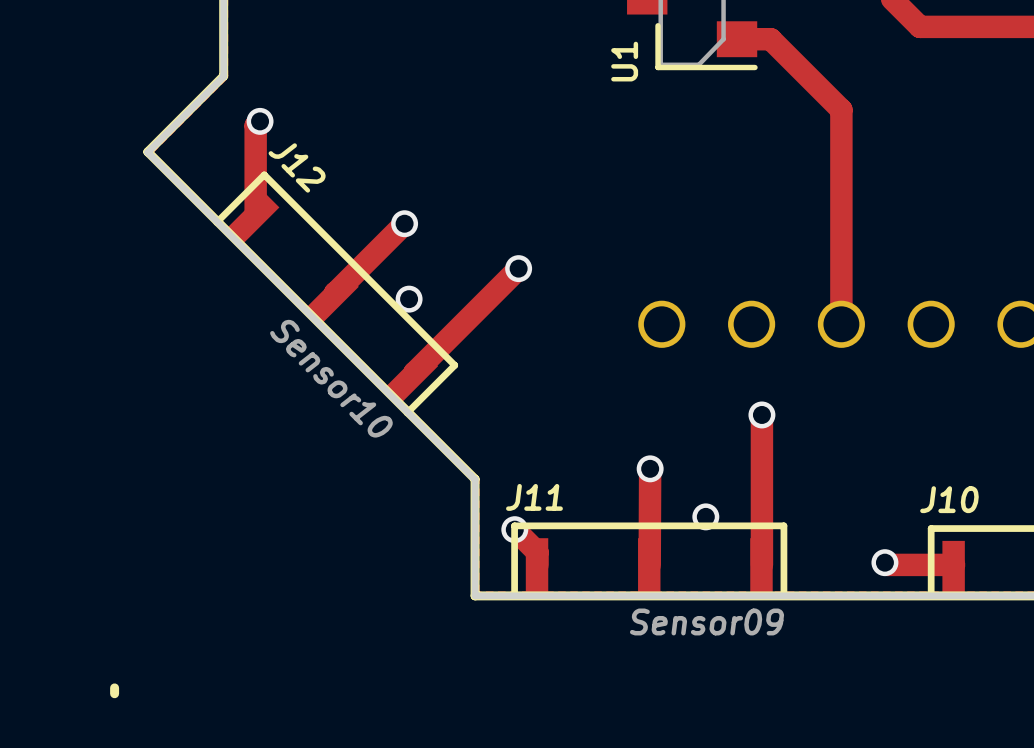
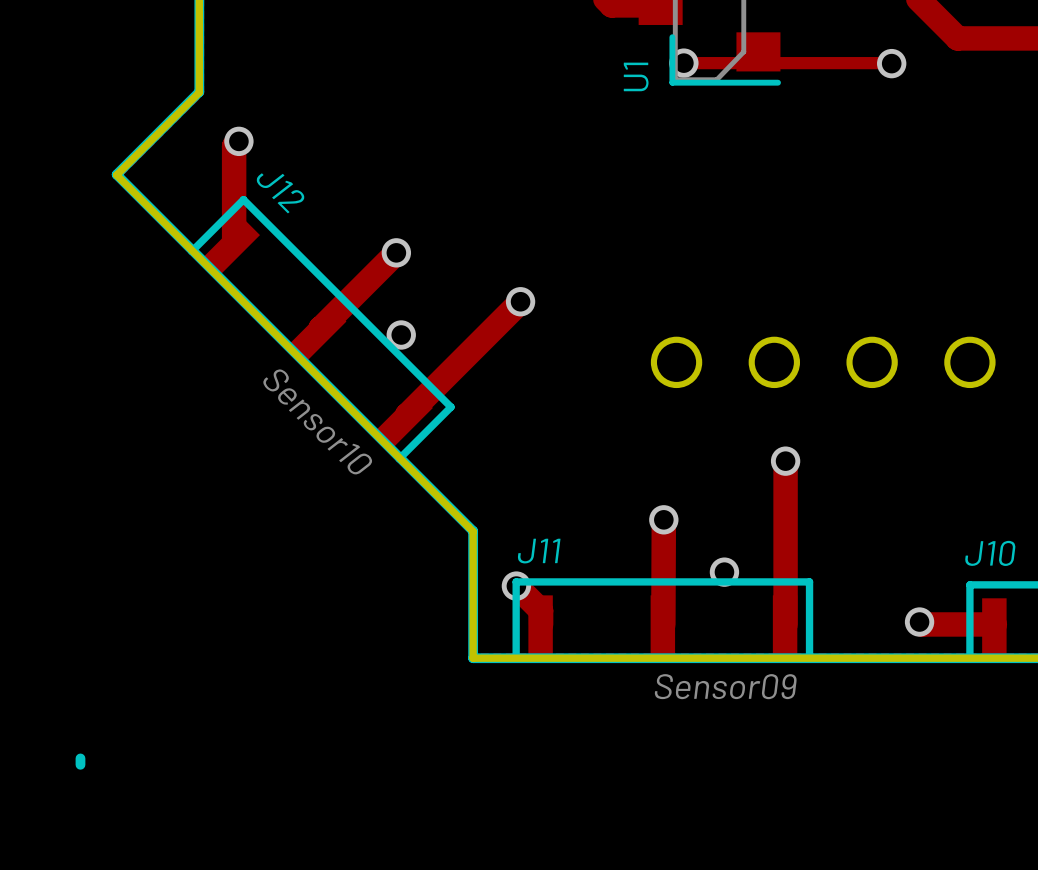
track: (737, 39) (770, 39) (841, 109) (841, 324) -> none
track: none -> (683, 63) (891, 63)
via: none -> (683, 63)
via: none -> (891, 63)

